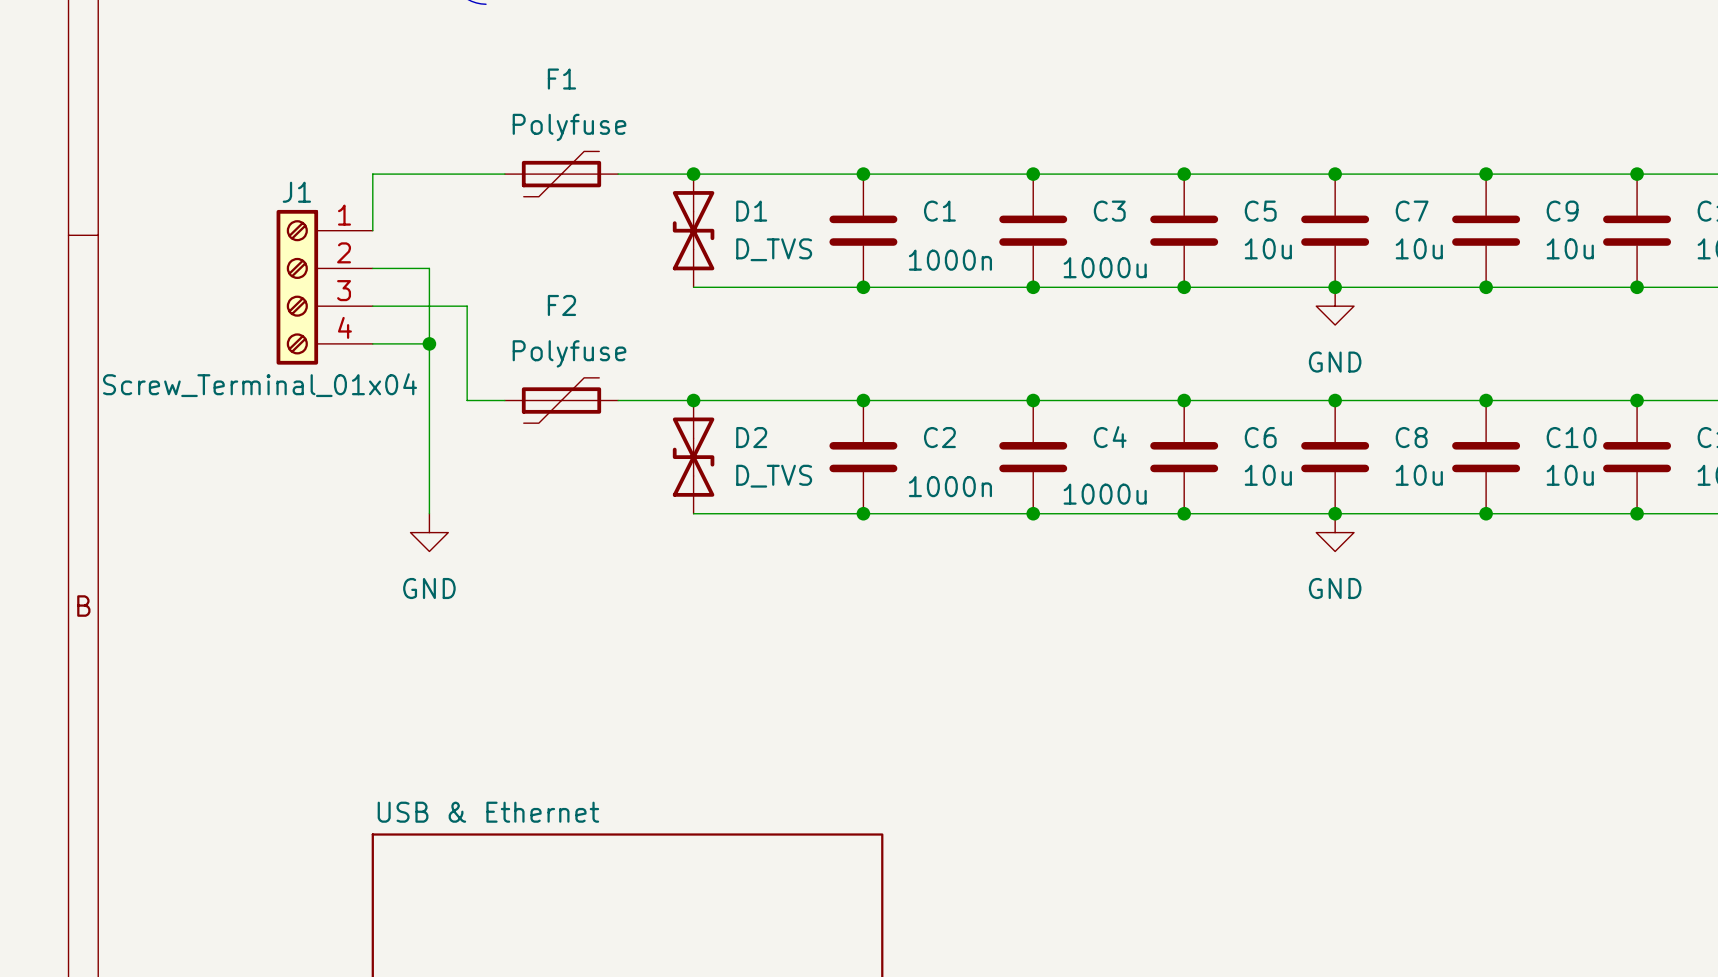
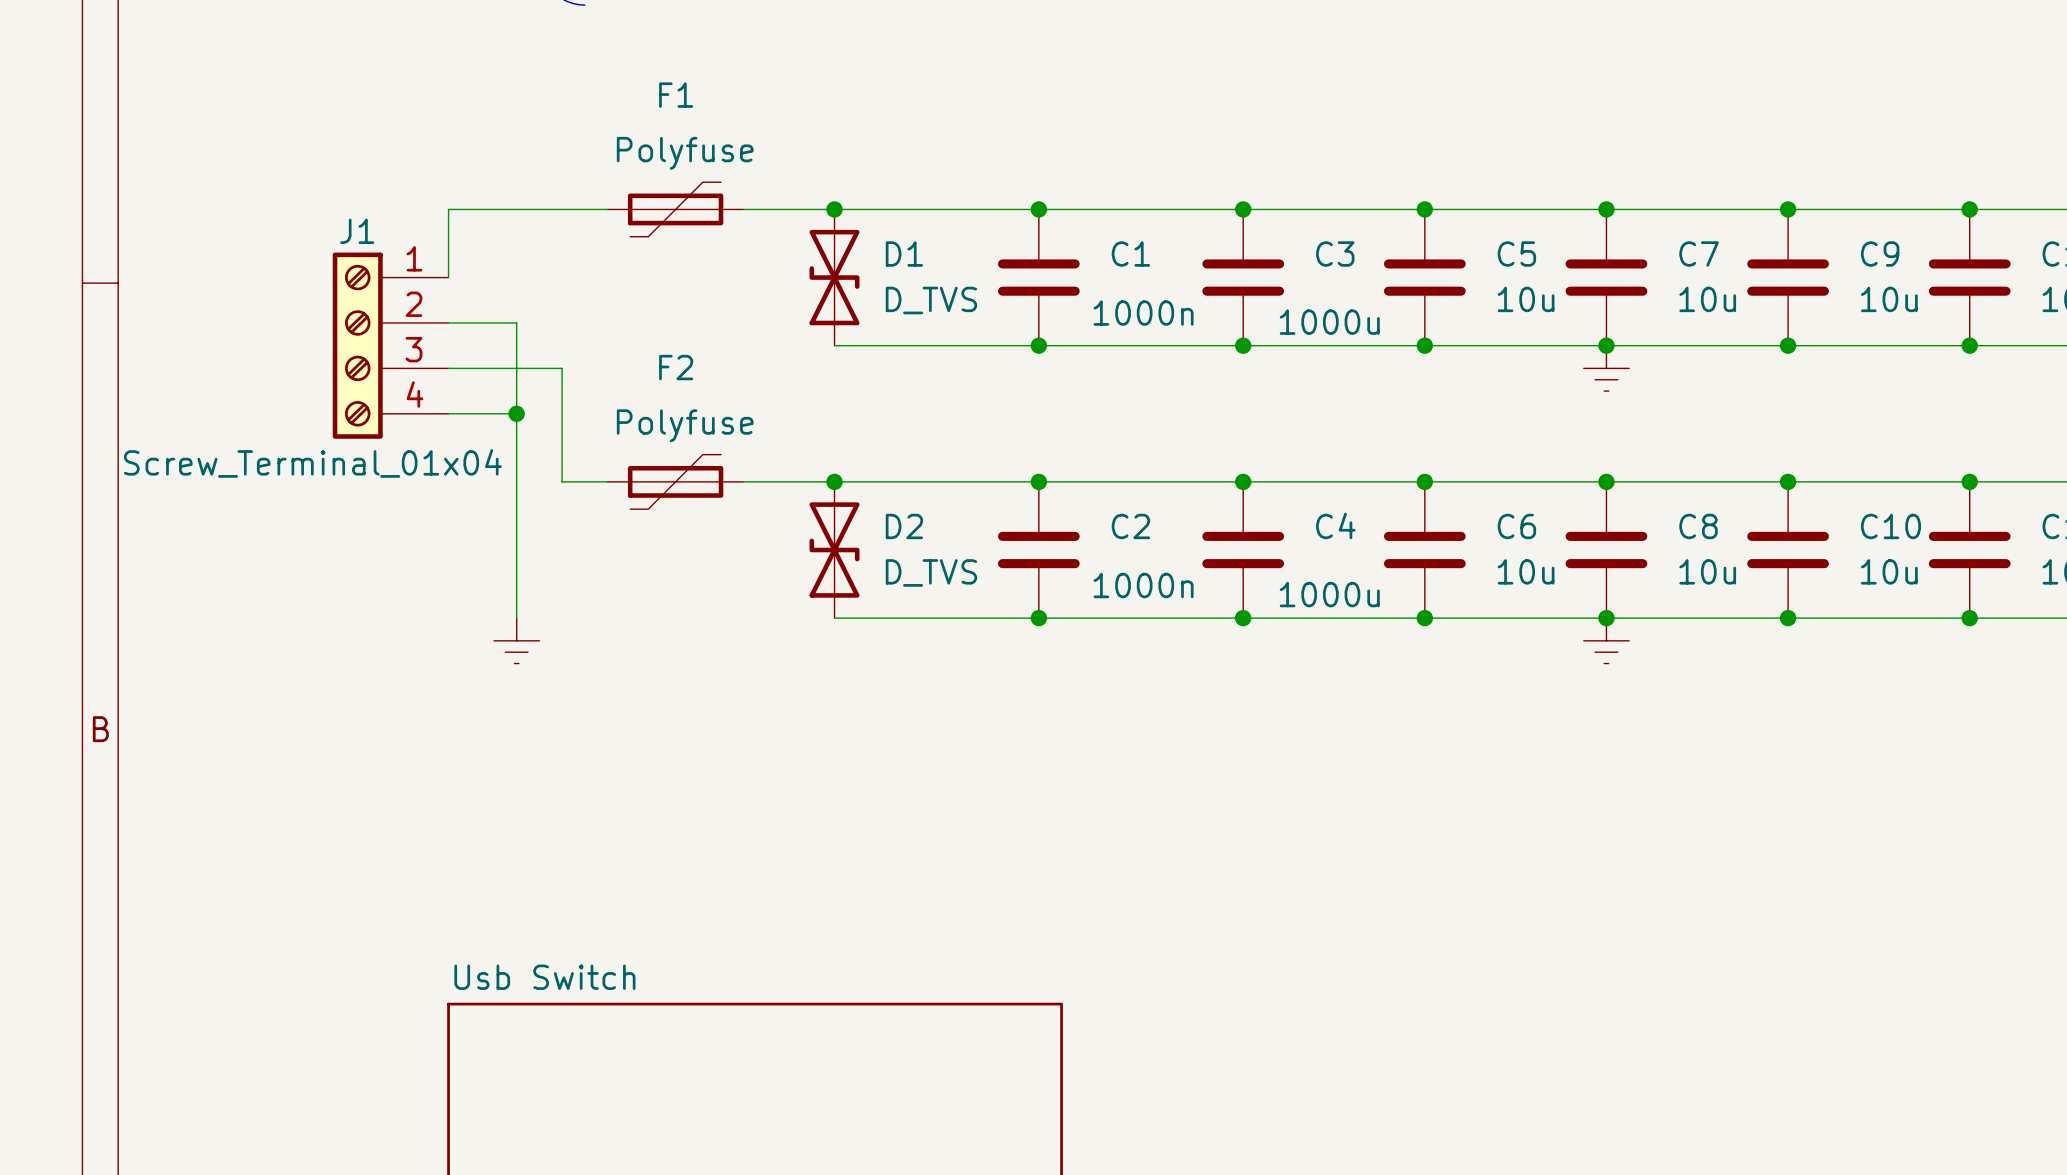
power symbol shape: [1316, 287, 1355, 326] -> [1583, 345, 1630, 392]
power symbol text: GND (1335, 362) -> none
power symbol shape: [410, 513, 449, 552] -> [493, 618, 540, 664]
power symbol shape: [1316, 513, 1355, 552] -> [1583, 618, 1630, 664]
power symbol text: GND (429, 588) -> none
power symbol text: GND (1335, 588) -> none
sheet USB & Ethernet name: USB & Ethernet (488, 812) -> Usb Switch (544, 977)

